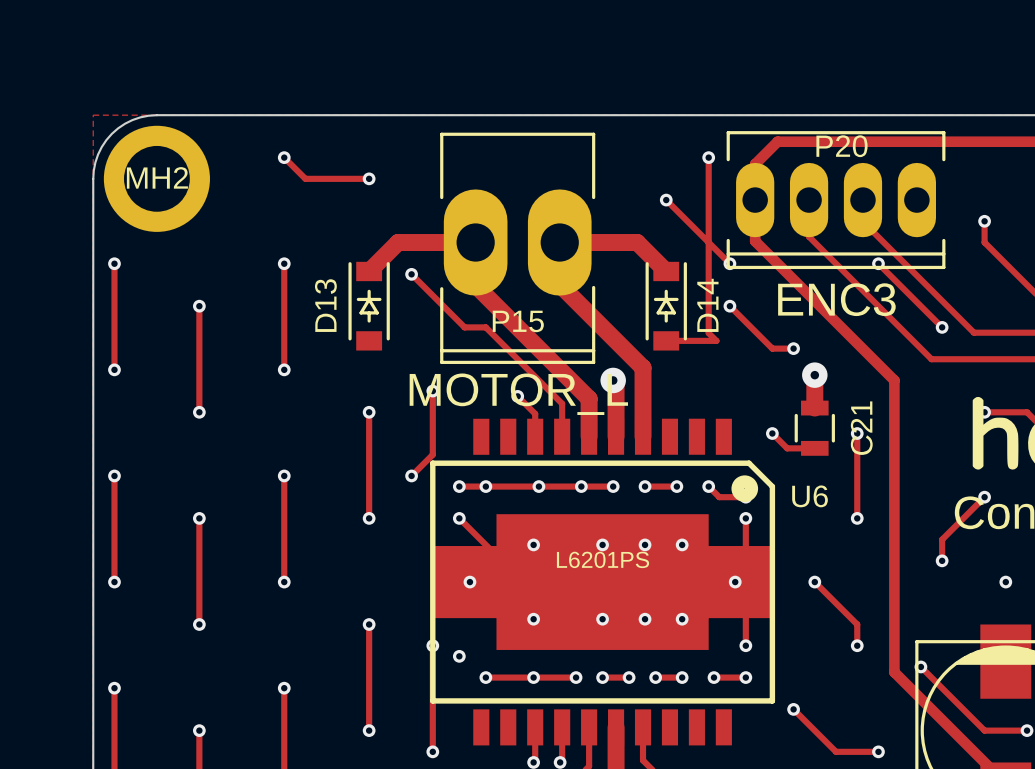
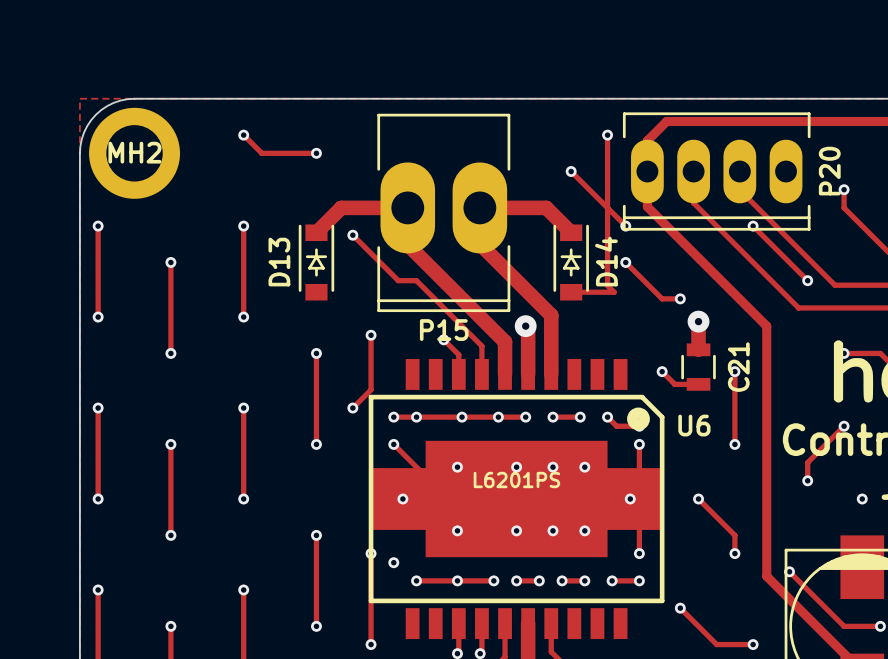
P20 name rotation: 0° (842, 146) -> 90° counterclockwise (829, 171)
P20 name position: P20 (842, 146) -> P20 (829, 171)
text: ENC3 (836, 299) -> none
P15 name position: P15 (518, 321) -> P15 (444, 330)
text: MOTOR_L (518, 394) -> none

